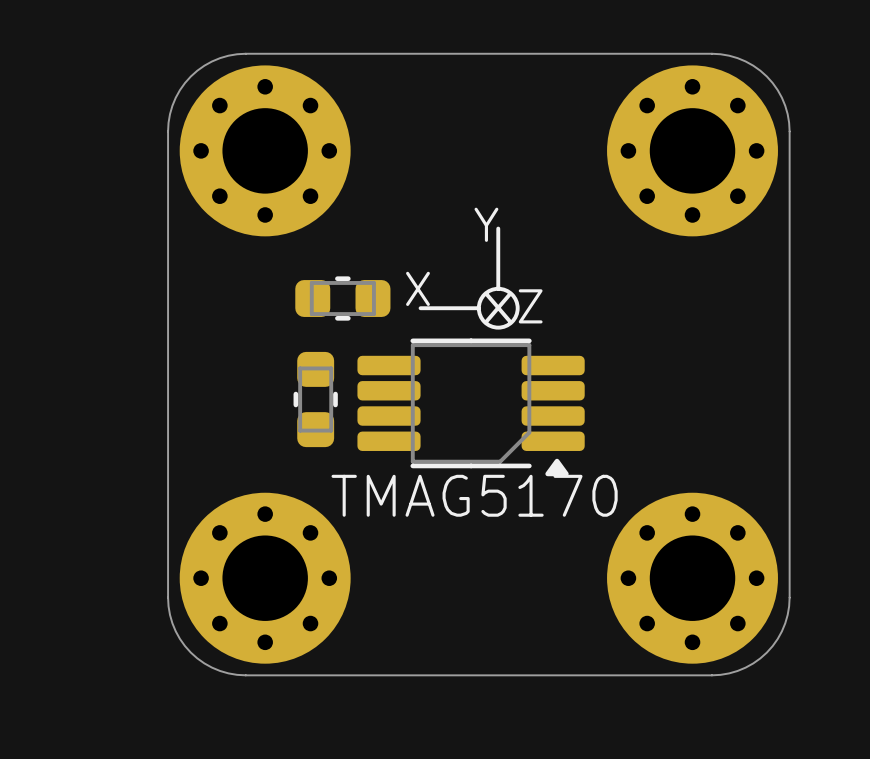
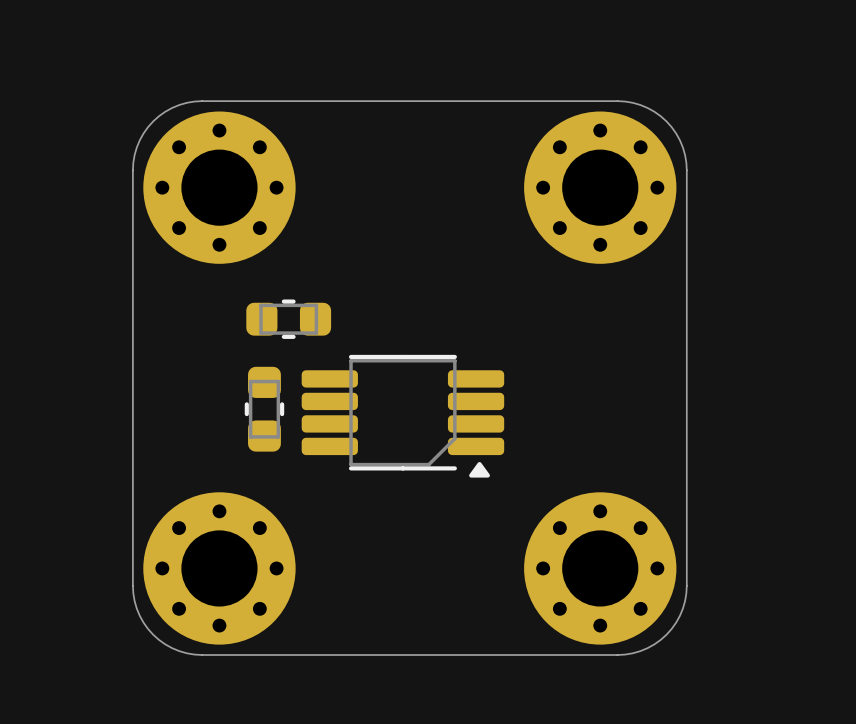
text: Y (486, 224) -> none
line: (498, 228) (498, 288) -> none
drawing: [476, 286, 520, 330] -> none
text: X (417, 288) -> none
line: (486, 294) (509, 321) -> none
line: (509, 294) (486, 321) -> none
text: Z (530, 306) -> none
line: (420, 308) (478, 308) -> none
text: TMAG5170 (474, 495) -> none

